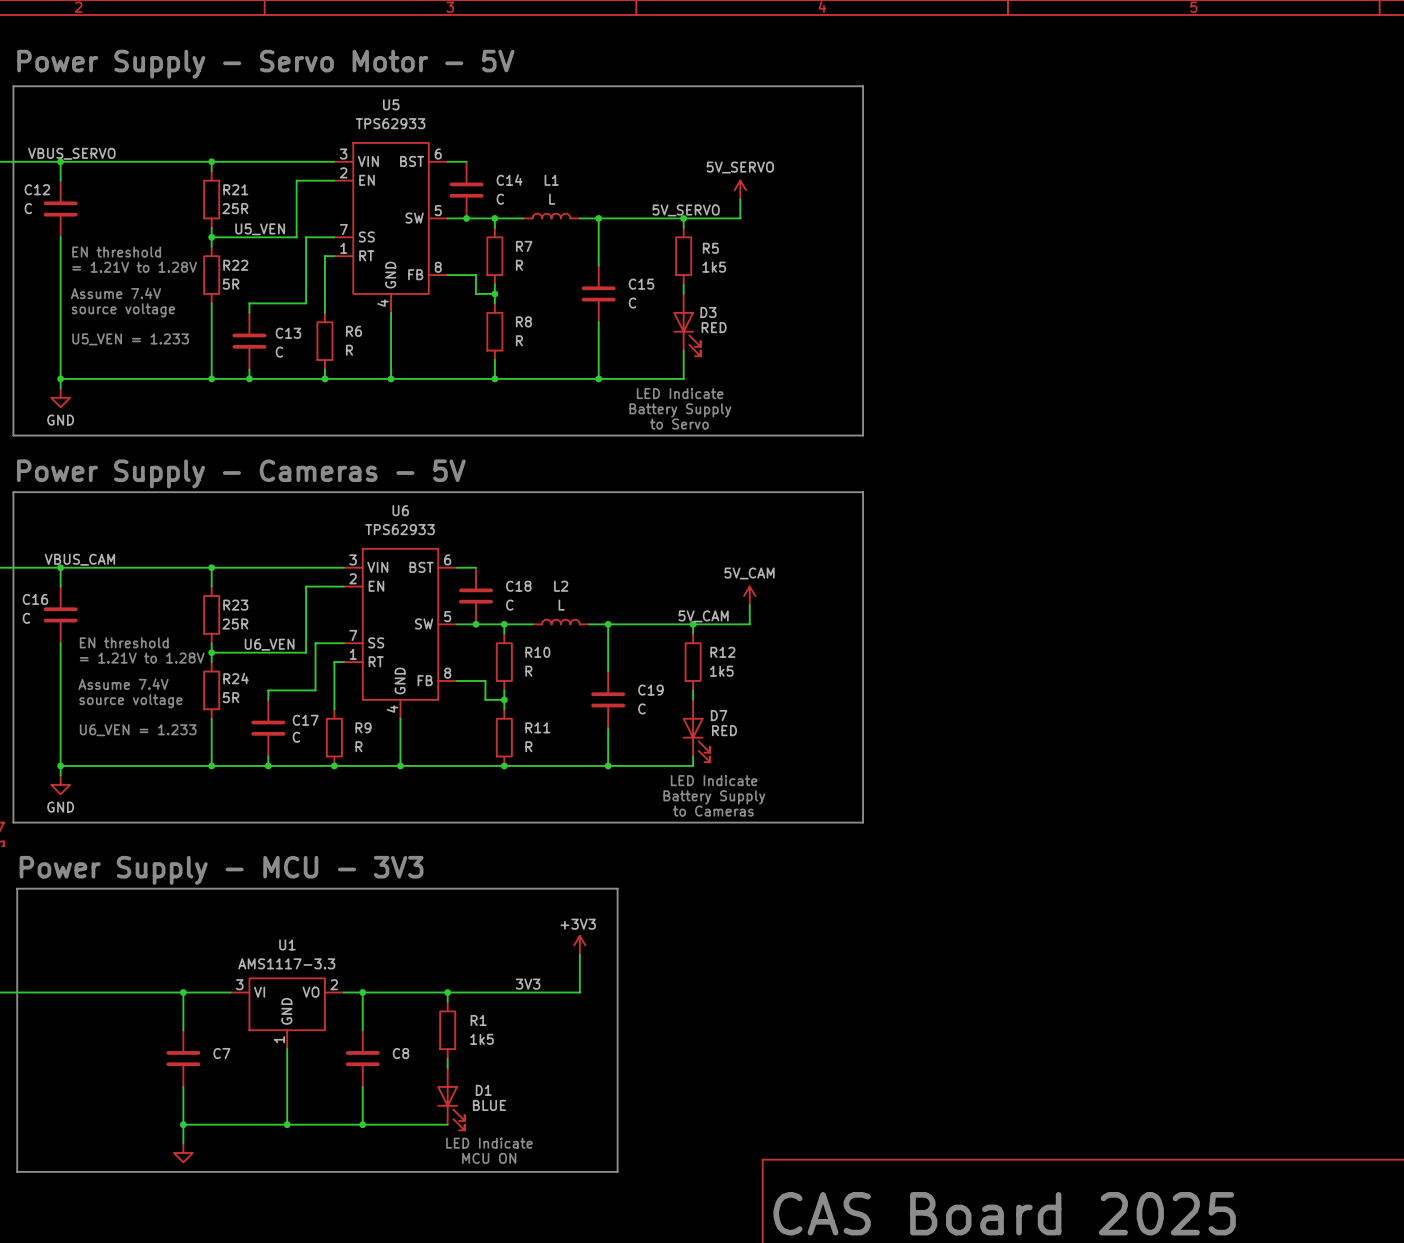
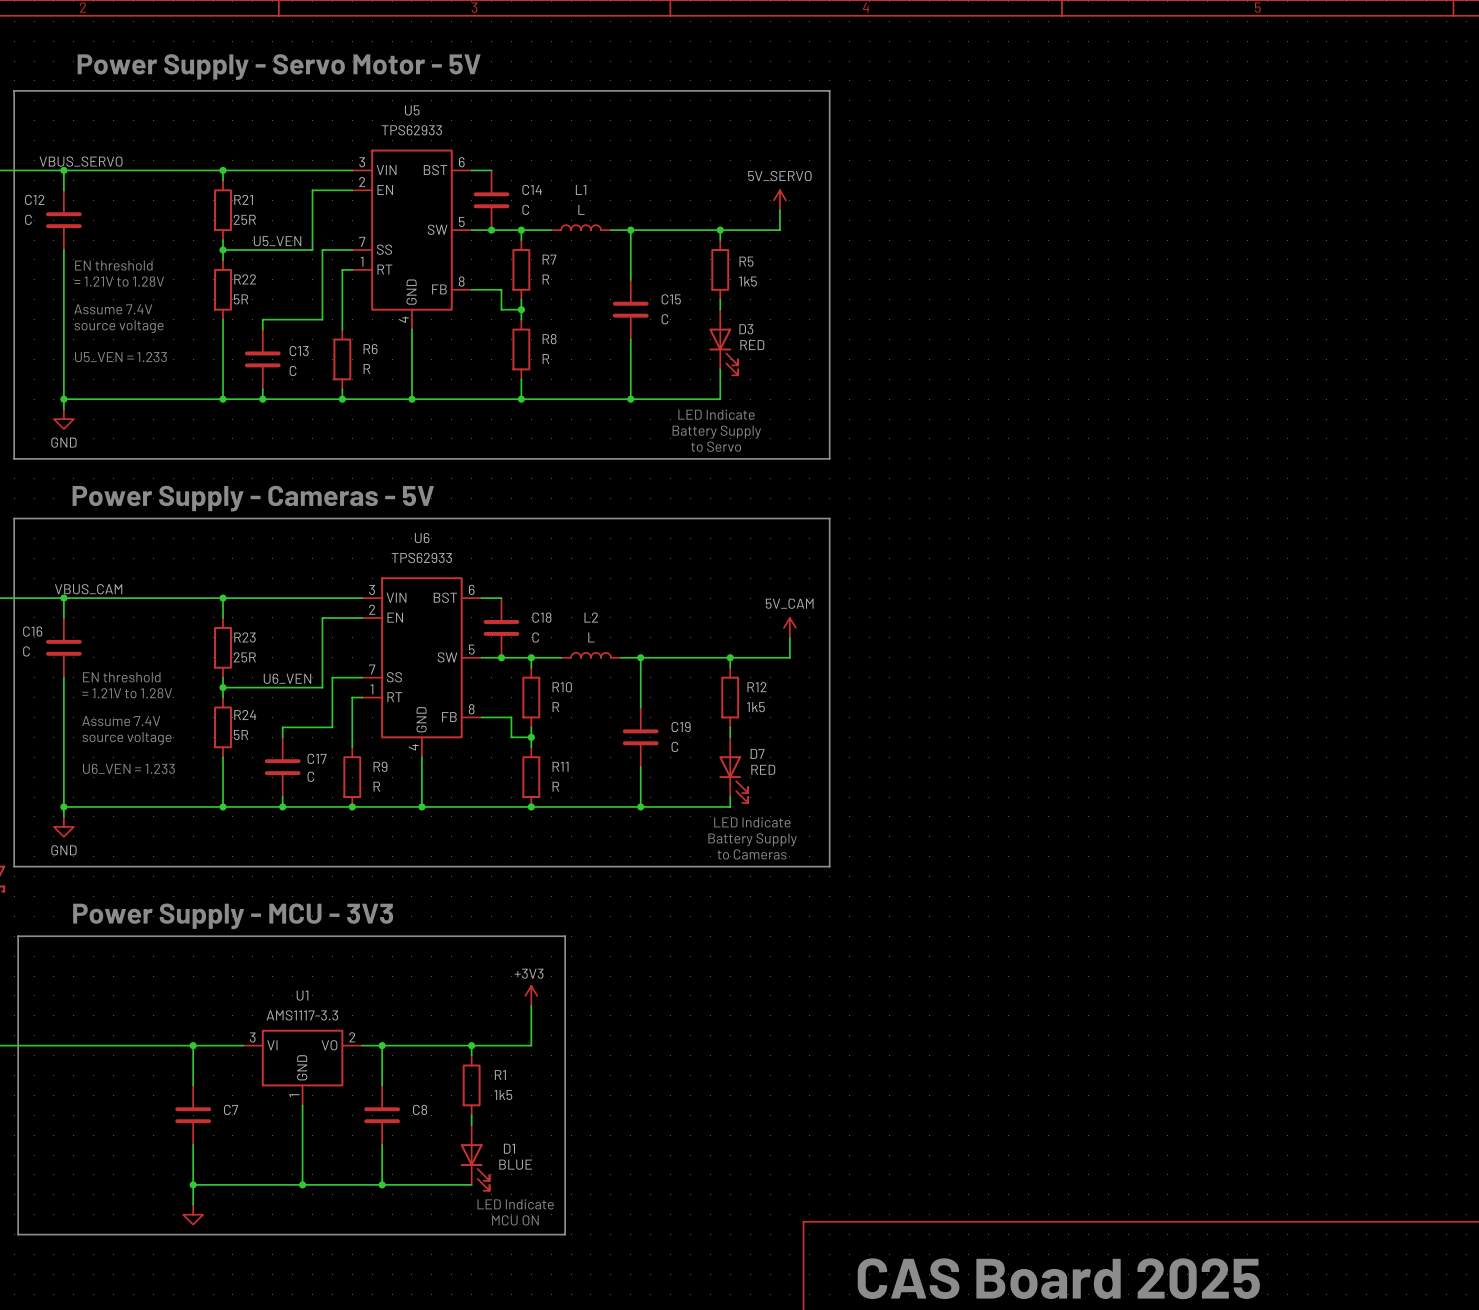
line: (787, 86) (863, 86) (863, 435) (787, 435) -> (829, 90) (829, 458)
label: 5V_SERVO (686, 210) -> none
line: (787, 492) (863, 492) (863, 822) (787, 822) -> (829, 518) (829, 866)
label: 5V_CAM (703, 616) -> none
line: (536, 888) (617, 888) (617, 1171) (536, 1171) -> (565, 936) (565, 1234)
power symbol position: +3V3 (579, 945) -> +3V3 (531, 995)
wire: (579, 954) (579, 992) (504, 992) -> (531, 1005) (531, 1045)
label: 3V3 (528, 984) -> none

